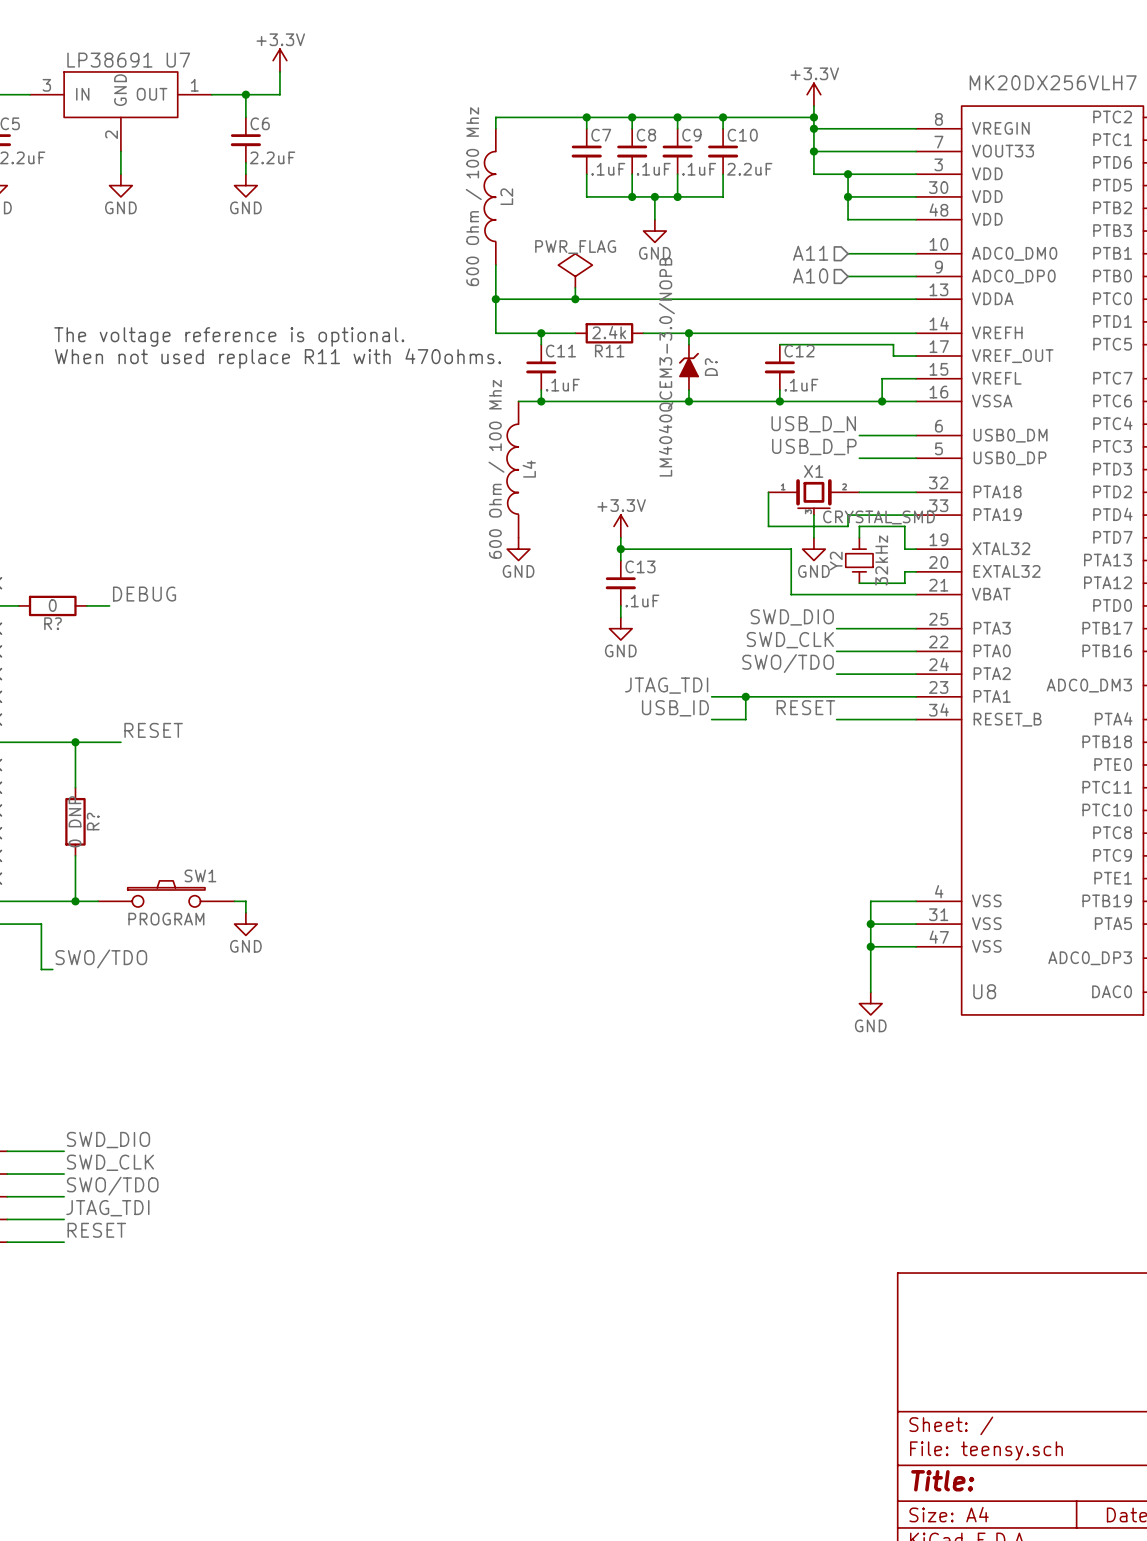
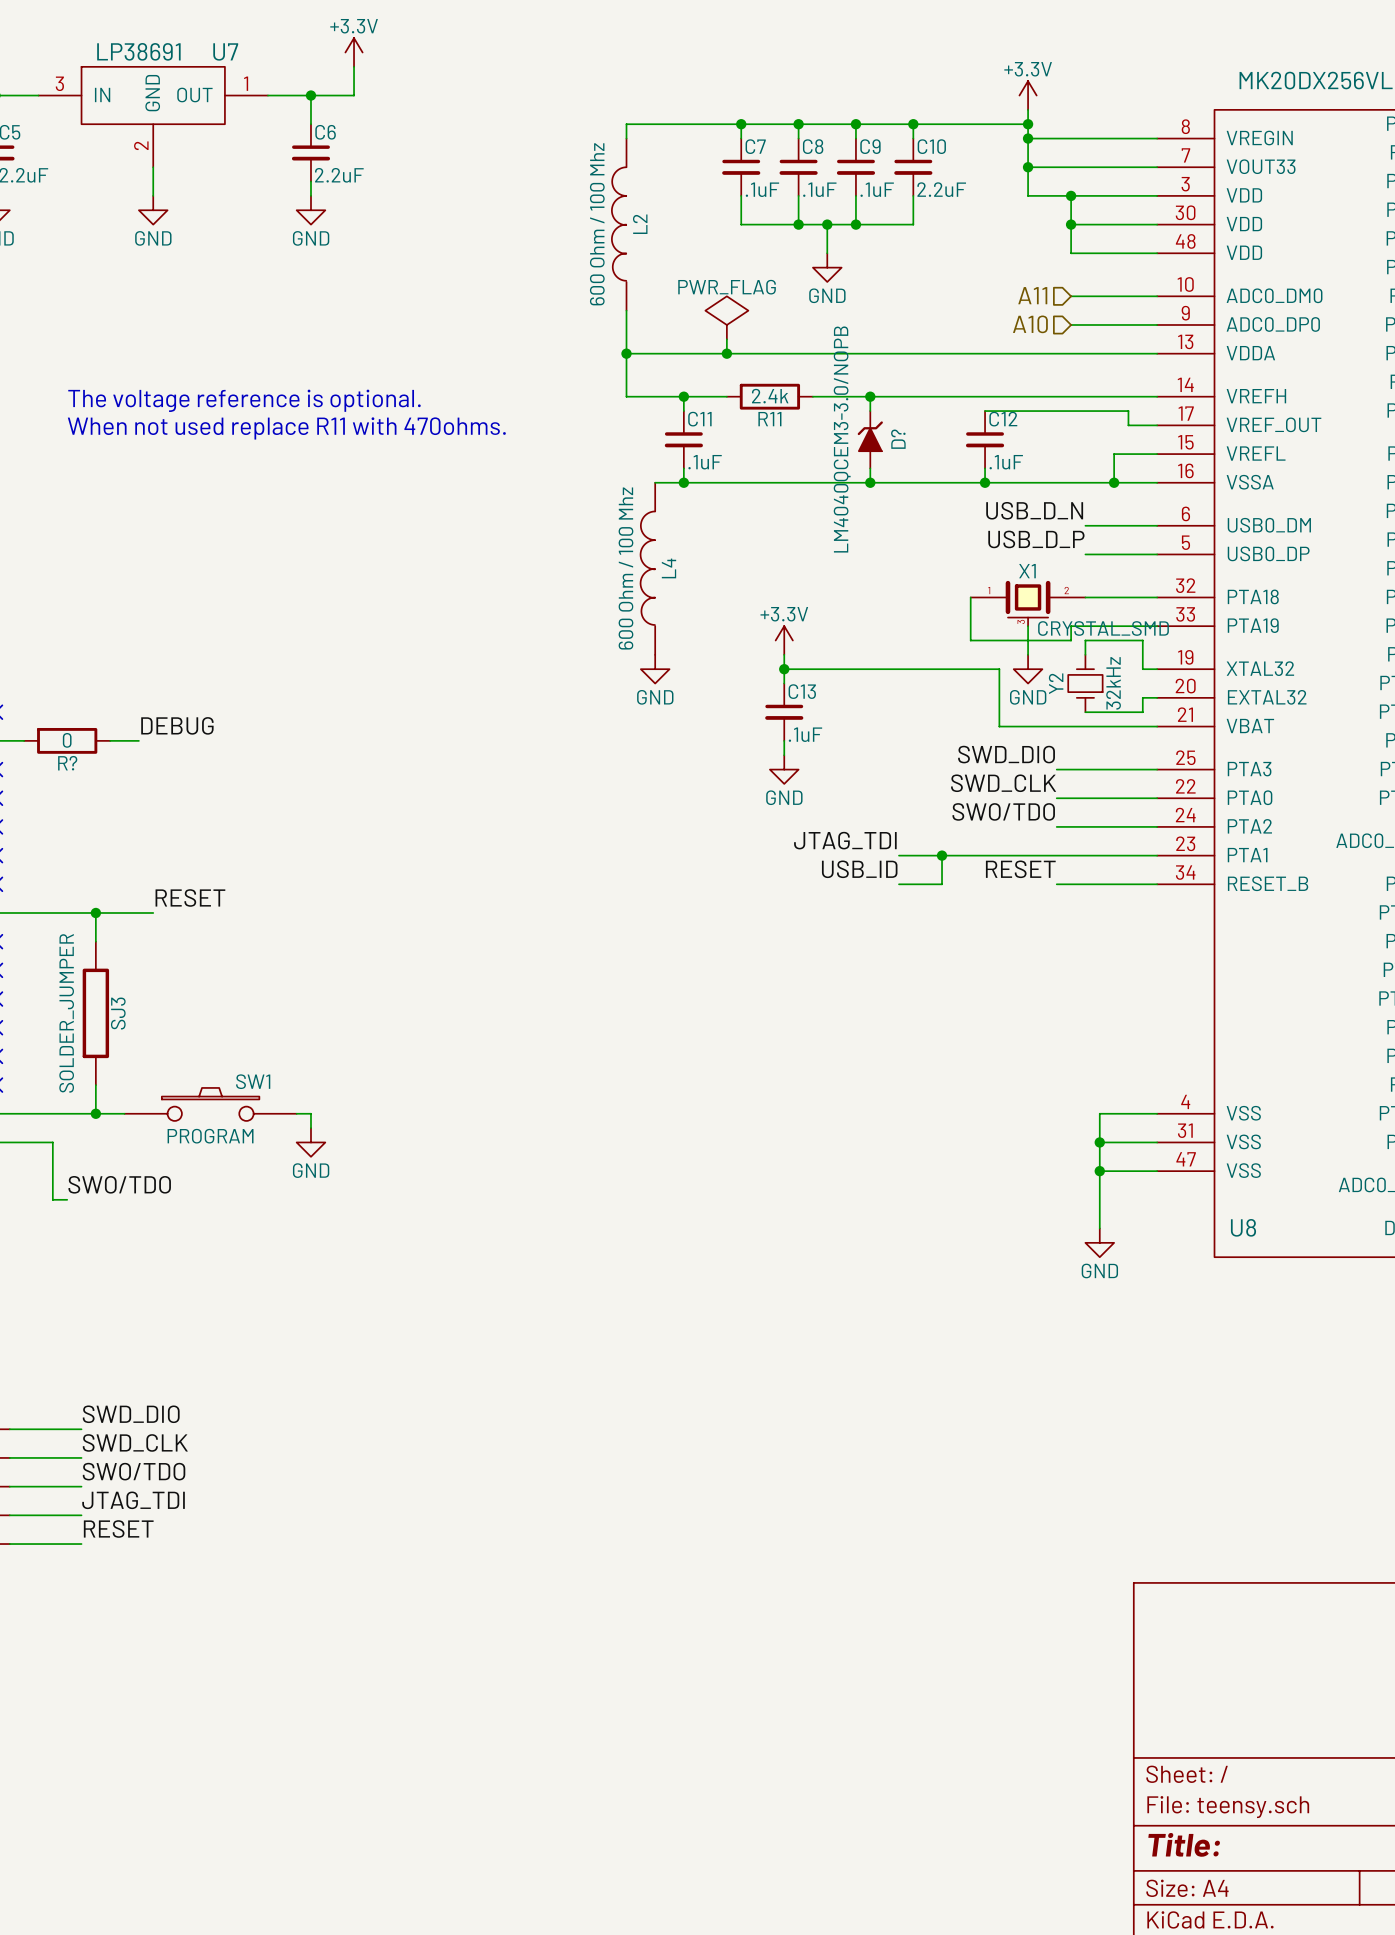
R?: 0 DNP (75, 821) -> none
SJ3: none -> SOLDER_JUMPER (95, 1013)

